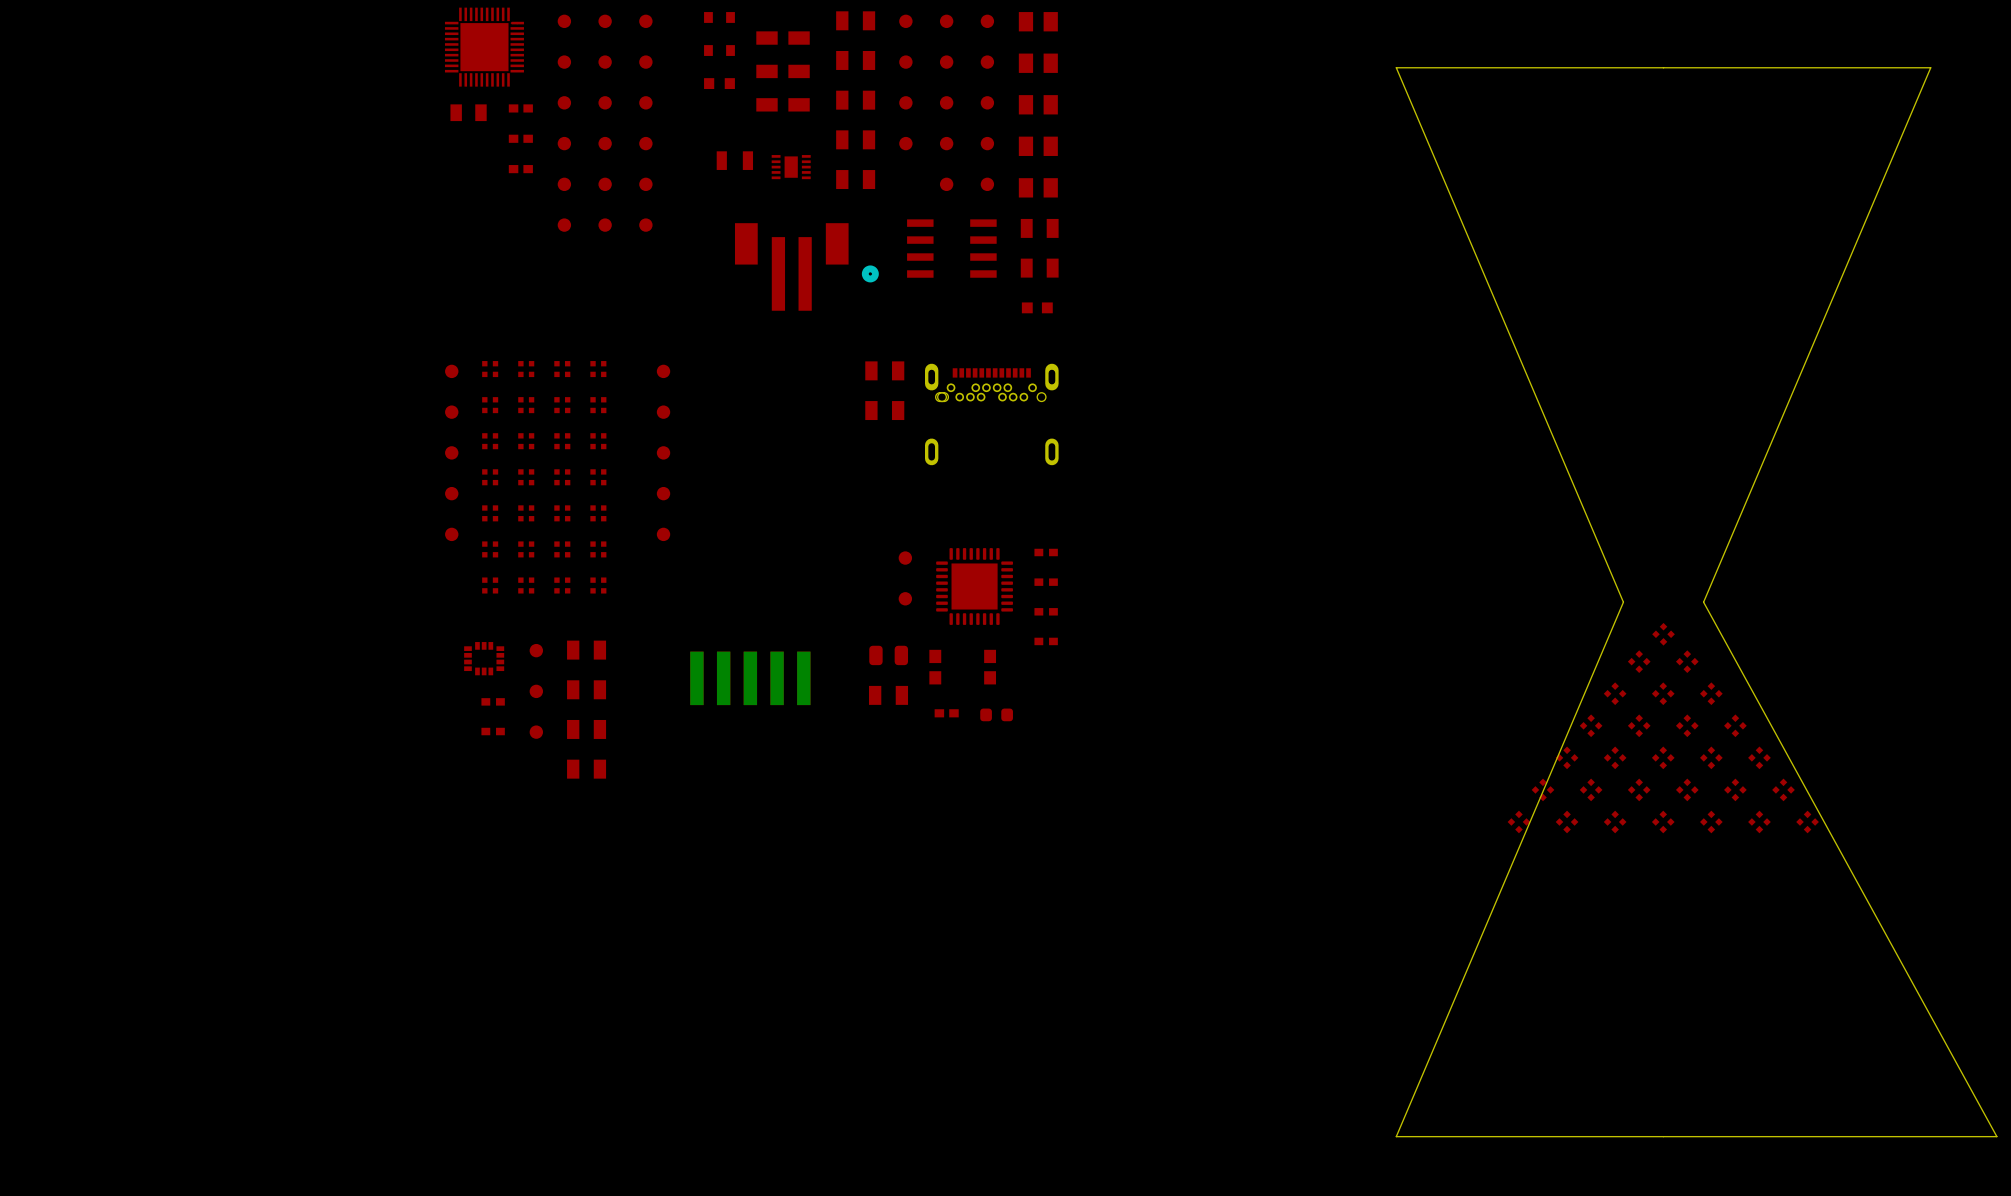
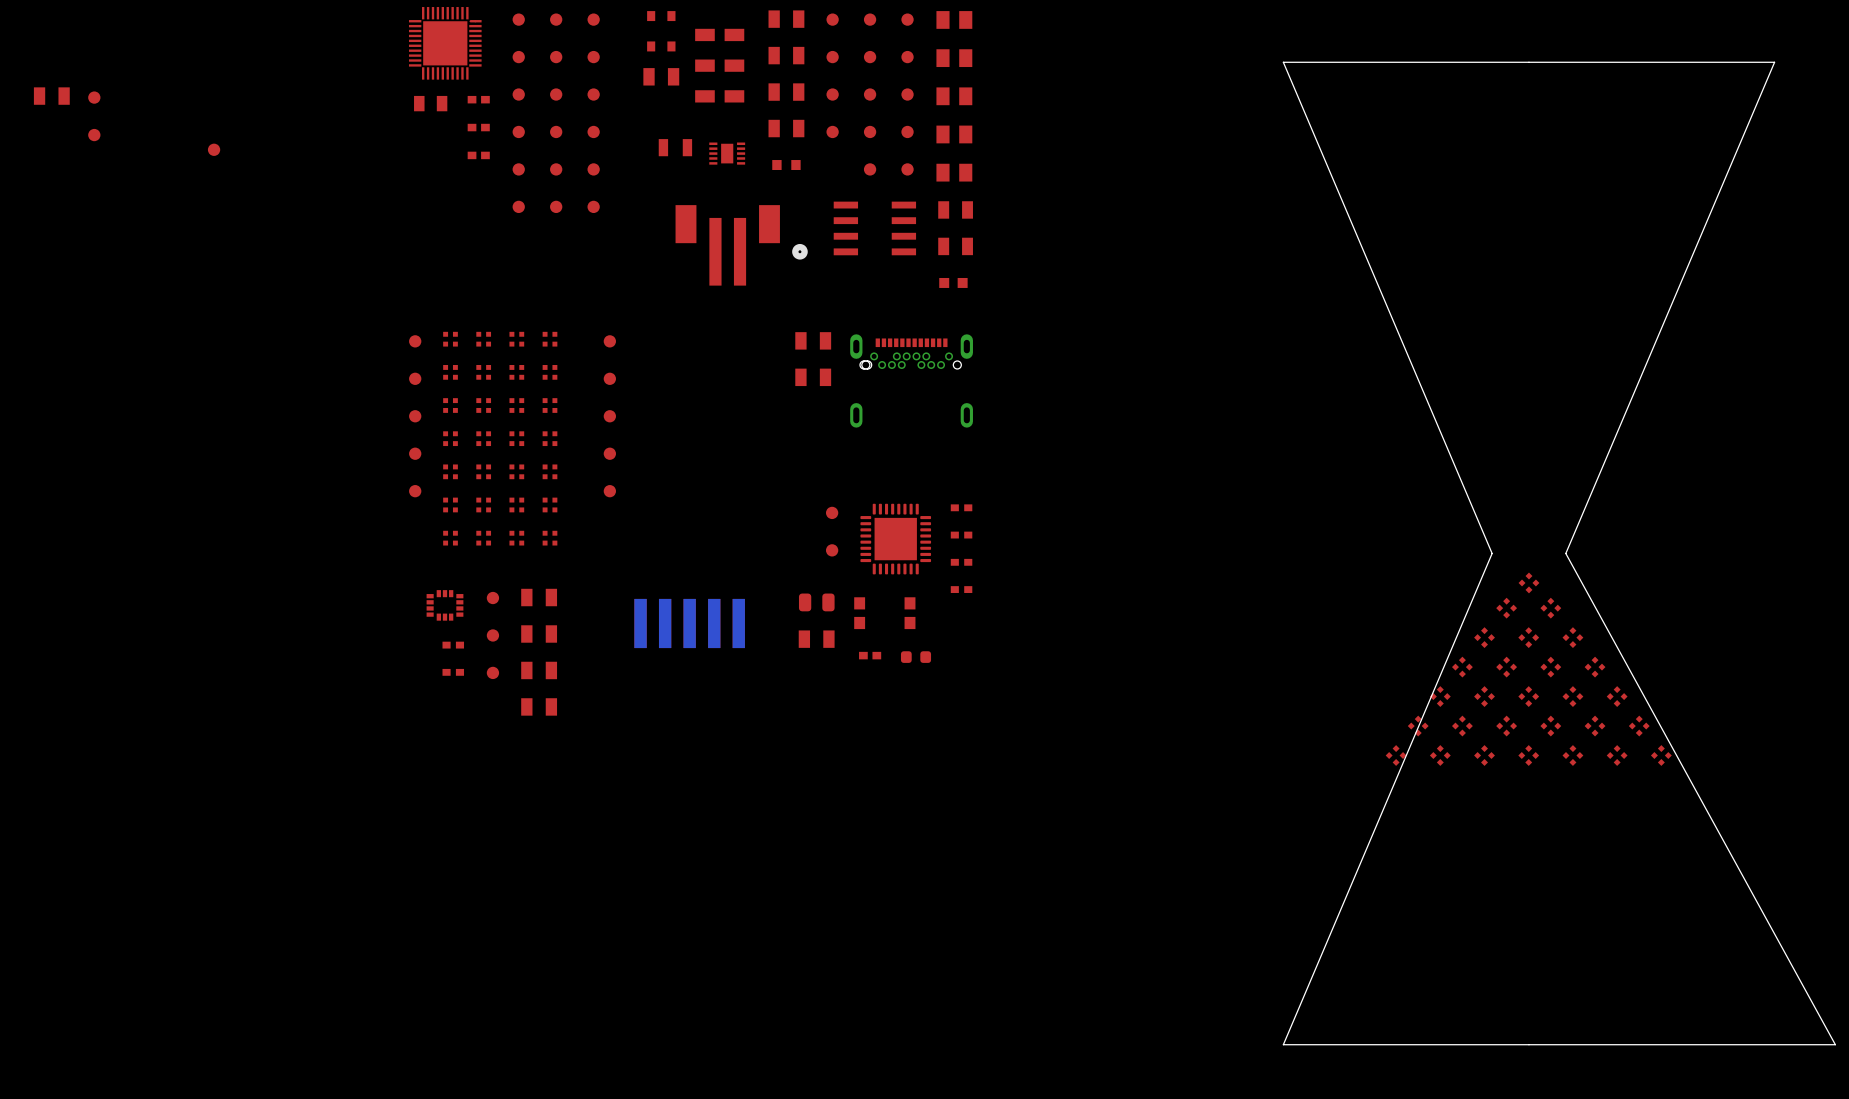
part footprint: [704, 78, 735, 90] -> [643, 68, 680, 86]
part: none -> (51, 96)
part: none -> (94, 97)
part: none -> (94, 135)
part: none -> (214, 149)
part footprint: [836, 170, 876, 190] -> [772, 160, 801, 171]

